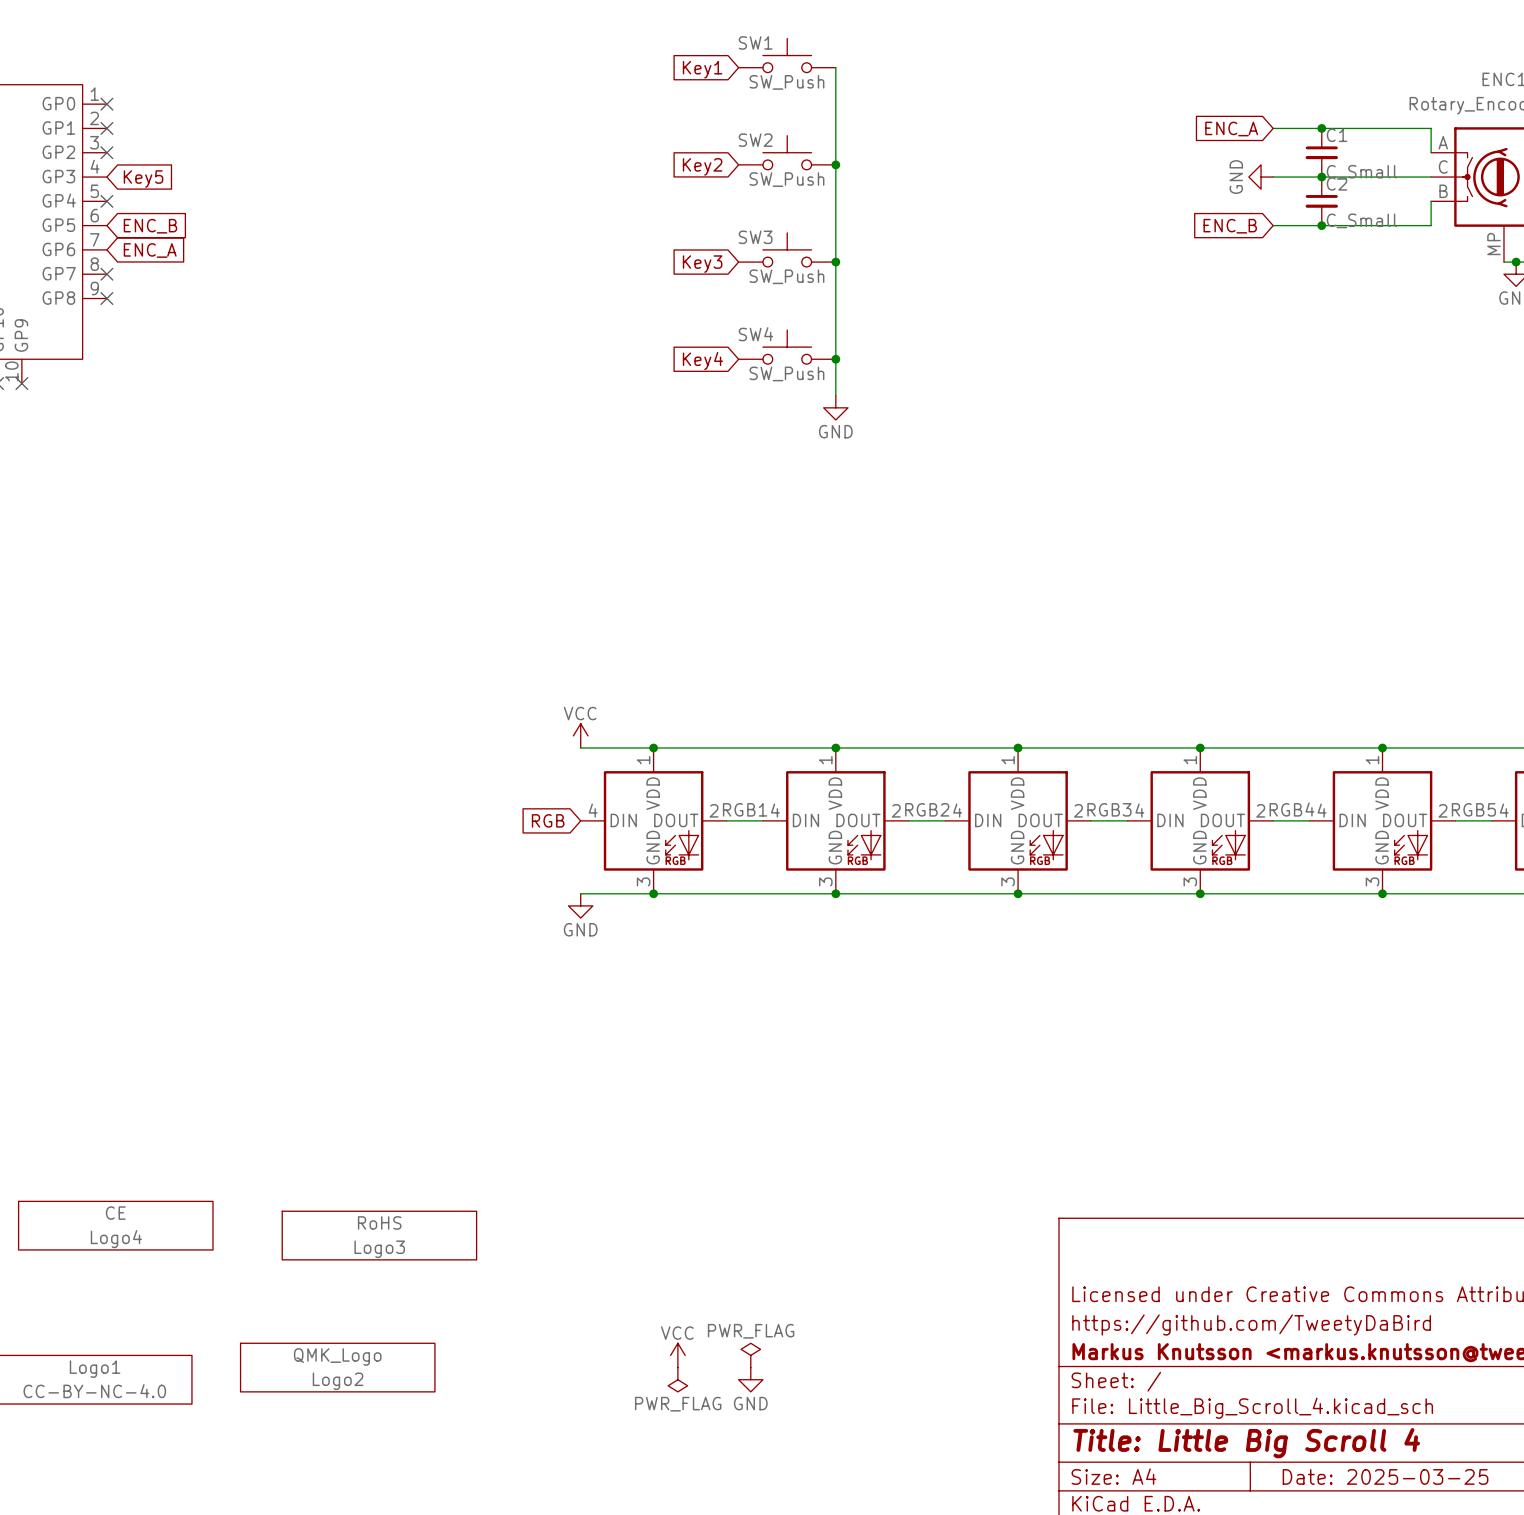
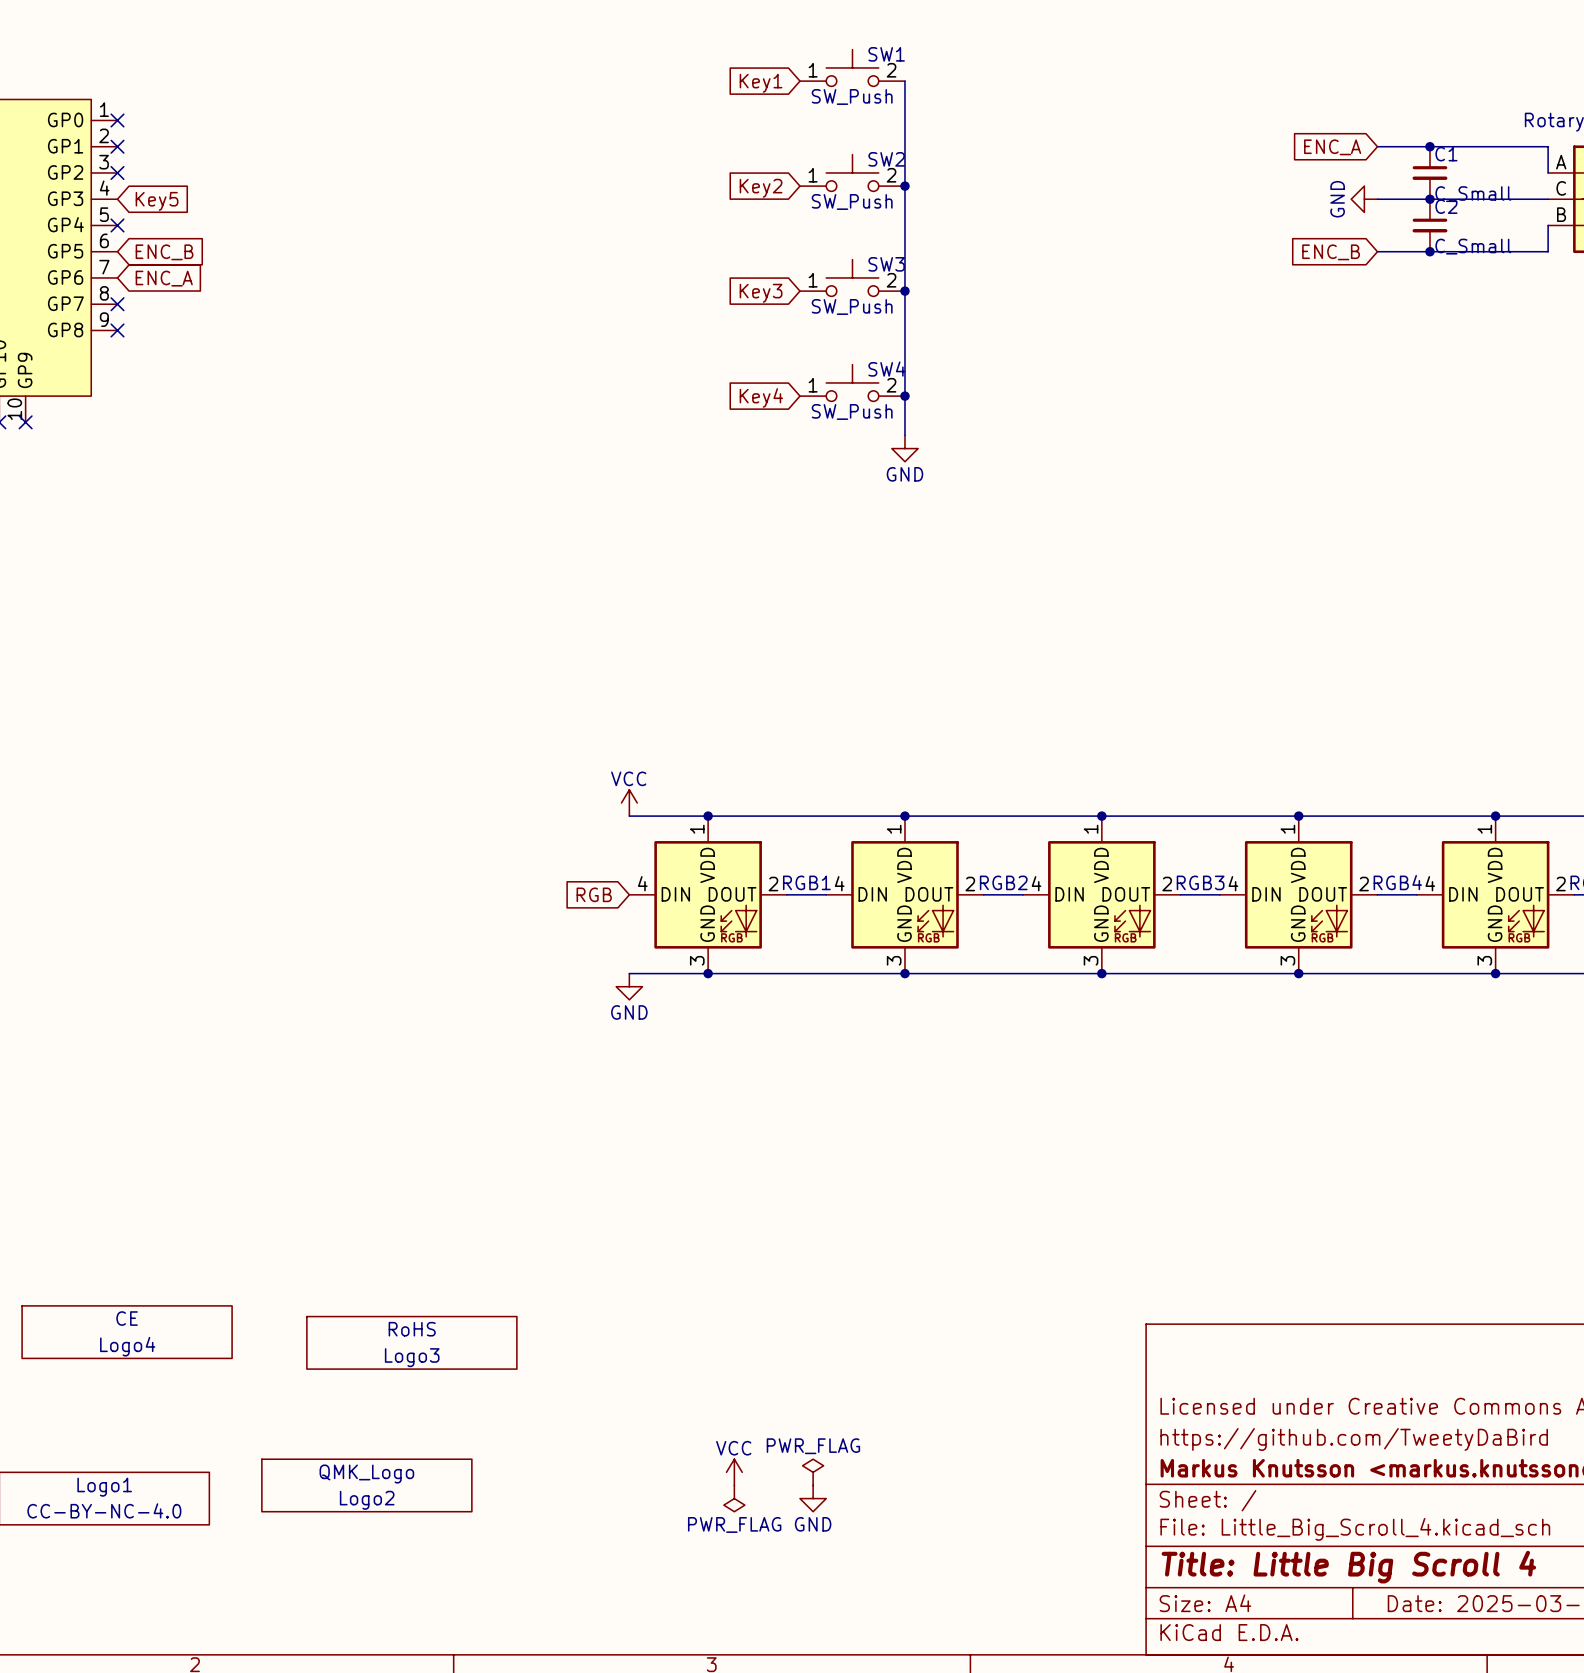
SW1 name position: SW1 (755, 42) -> SW1 (886, 54)
SW1 pin number: none -> 1 (813, 70)
SW1 pin number: none -> 2 (891, 70)
SW2 name position: SW2 (755, 140) -> SW2 (886, 159)
SW2 pin number: none -> 1 (813, 175)
SW2 pin number: none -> 2 (891, 175)
SW3 name position: SW3 (755, 237) -> SW3 (886, 264)
SW3 pin number: none -> 1 (813, 280)
SW3 pin number: none -> 2 (891, 280)
SW4 name position: SW4 (755, 334) -> SW4 (886, 369)
SW4 pin number: none -> 1 (813, 385)
SW4 pin number: none -> 2 (891, 385)

